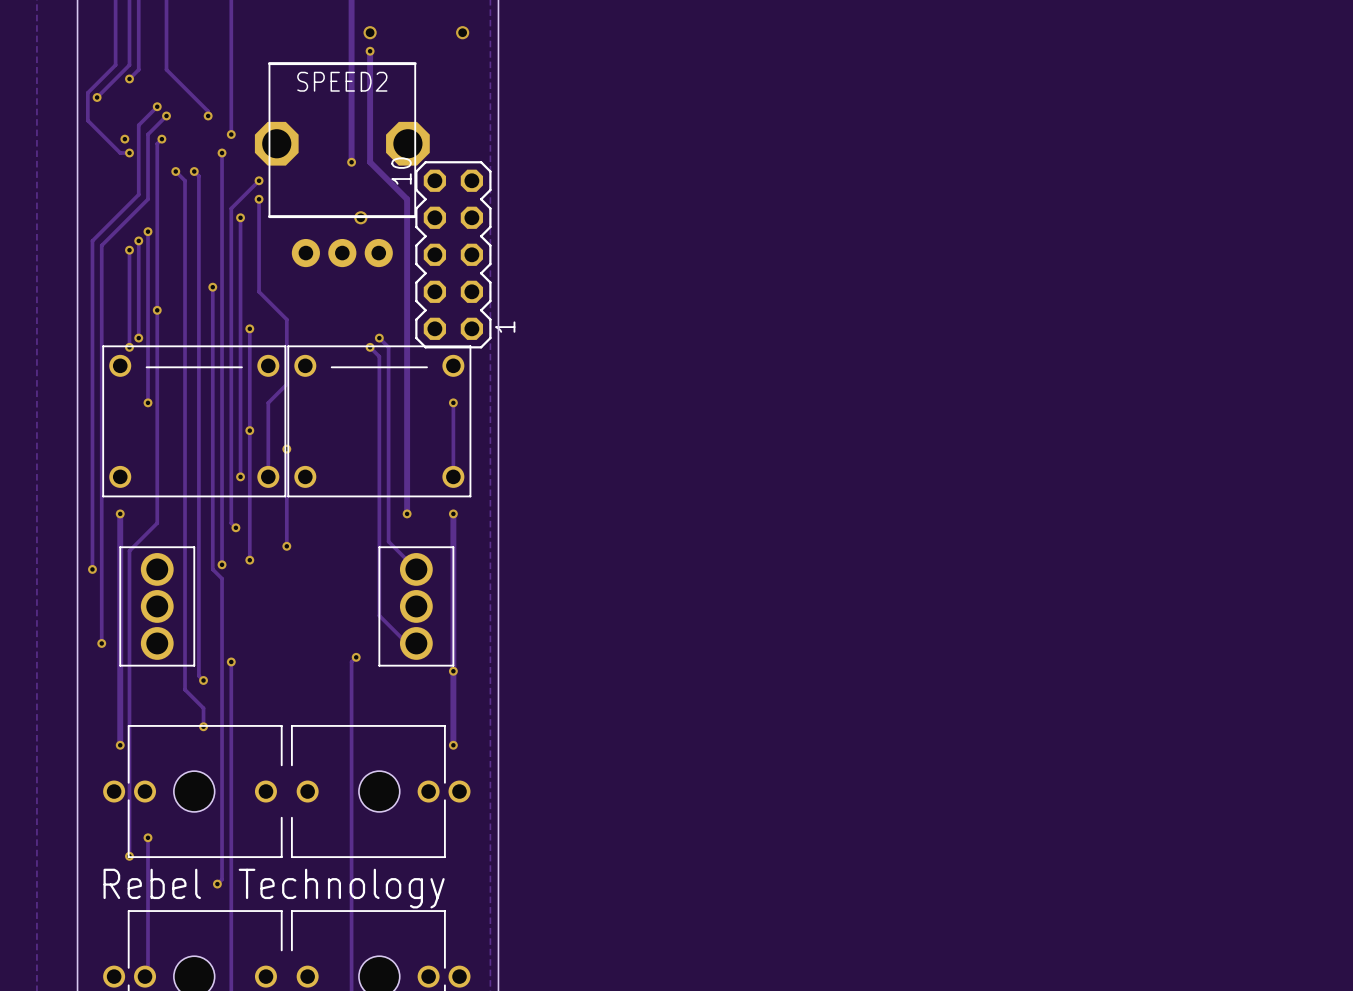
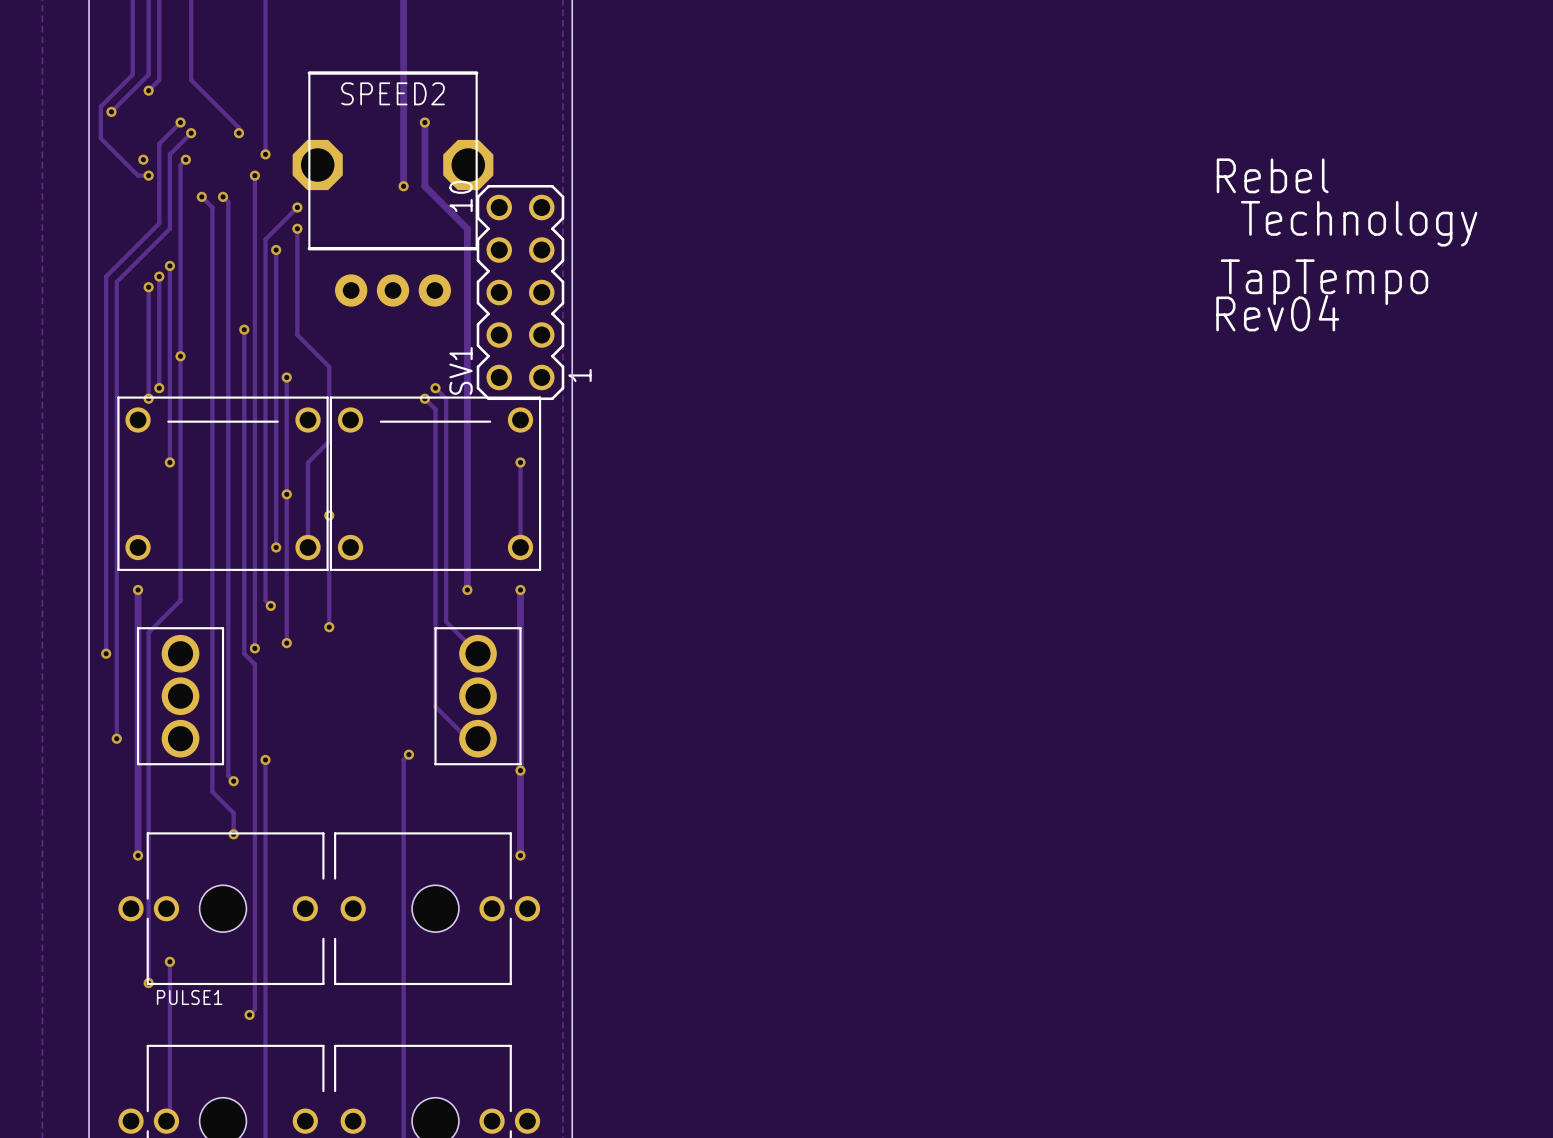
via: (370, 32) -> none
via: (462, 32) -> none
track: (370, 51) (370, 106) -> none
via position: (370, 51) -> (424, 122)
text: none -> Rebel (1272, 175)
text: none -> Technology (1359, 223)
via: (360, 217) -> none
text: none -> TapTempo (1324, 282)
part: (453, 254) -> none
SV1: none -> (520, 292)
text: none -> Rev04 (1277, 313)
PULSE1 name: none -> PULSE1 (189, 997)
text: Rebel (152, 883) -> none
text: Technology (341, 888) -> none

